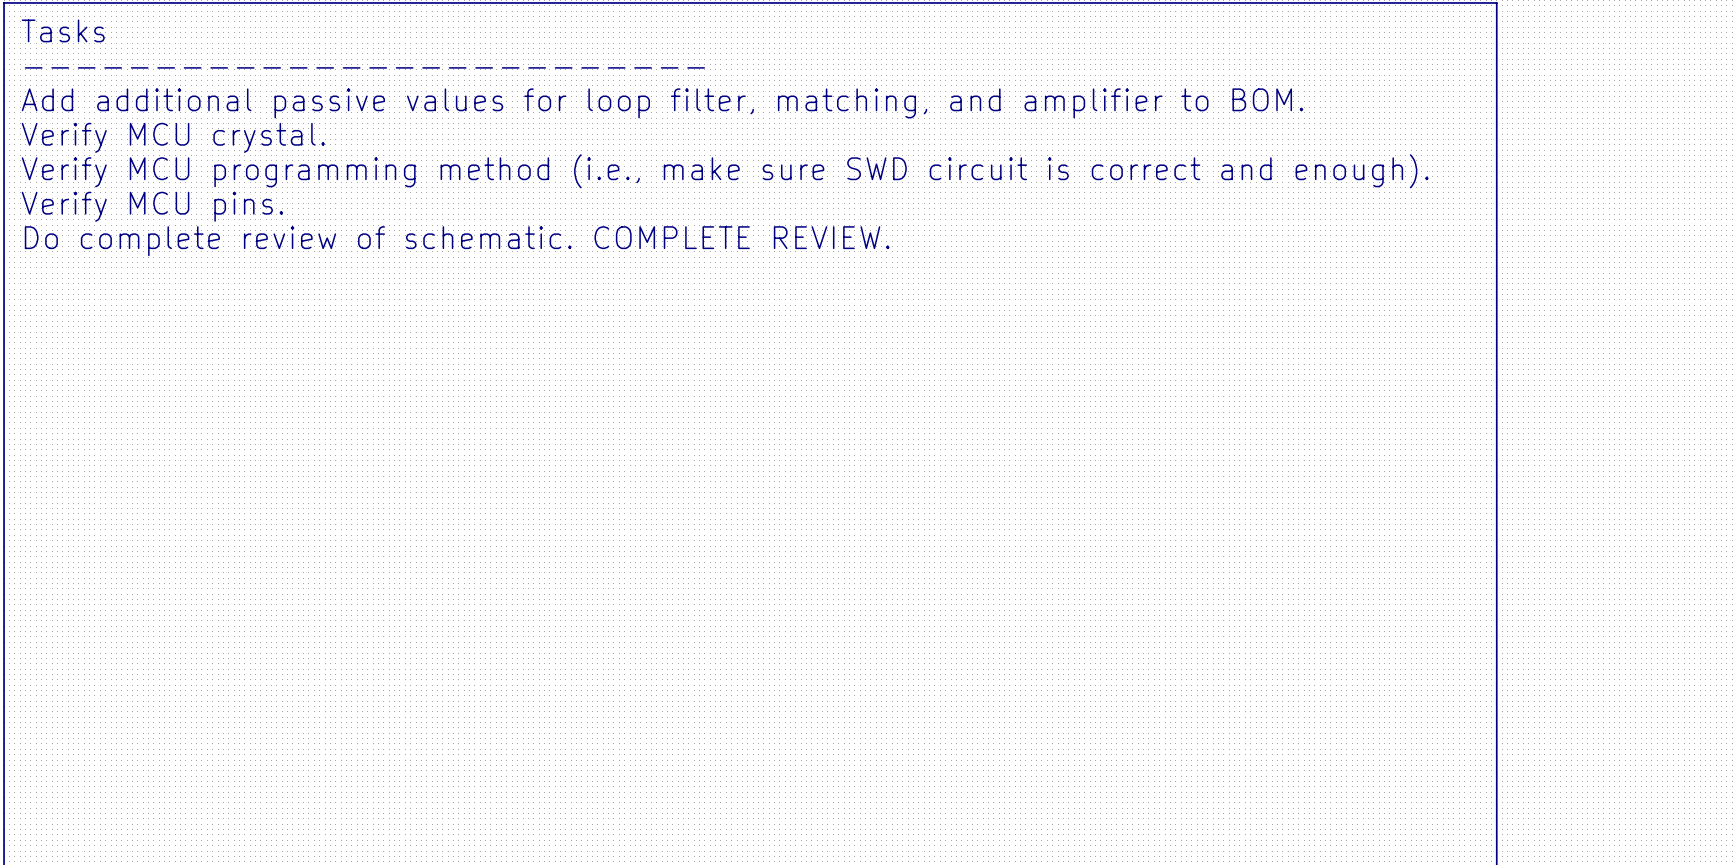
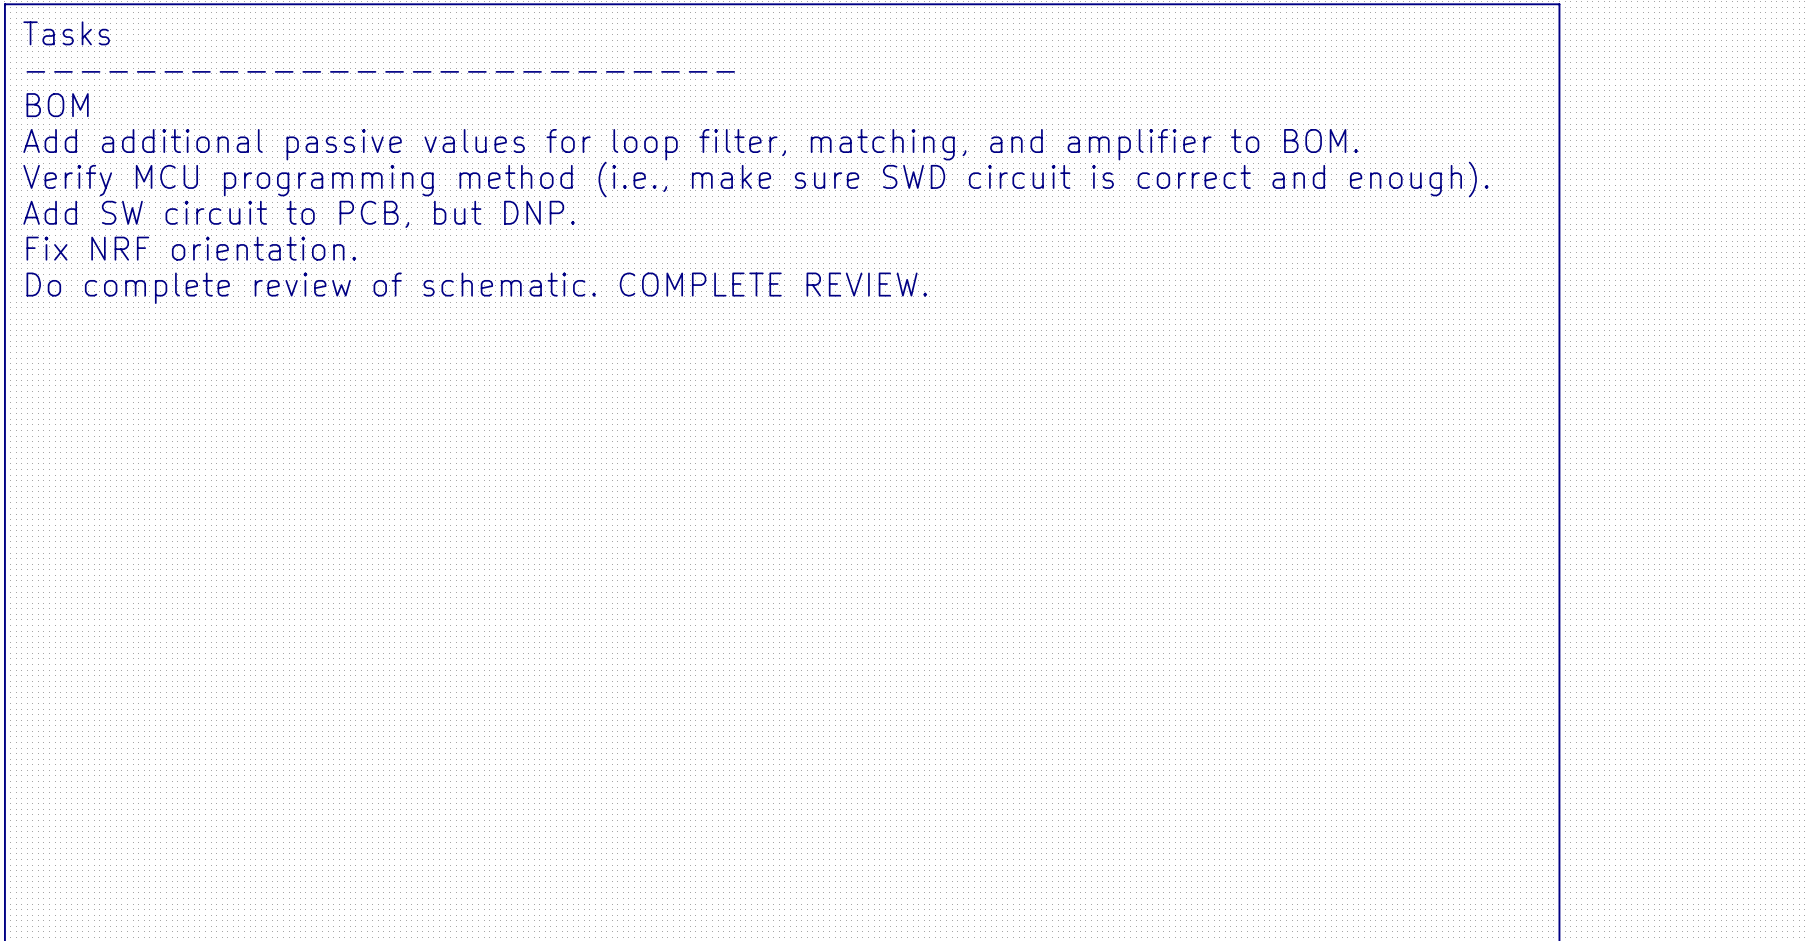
text: Add additional passive values for loop filter, matching, and amplifier to BOM. (662, 103) -> BOM (57, 105)
text: Verify MCU crystal. (173, 137) -> Add additional passive values for loop filter, matching, and amplifier to BOM. (690, 144)
text: Verify MCU pins. (152, 206) -> Add SW circuit to PCB, but DNP. (299, 214)
text: Do complete review of schematic. COMPLETE REVIEW. (457, 241) -> Fix NRF orientation. (191, 248)
text: none -> Do complete review of schematic. COMPLETE REVIEW. (476, 288)

